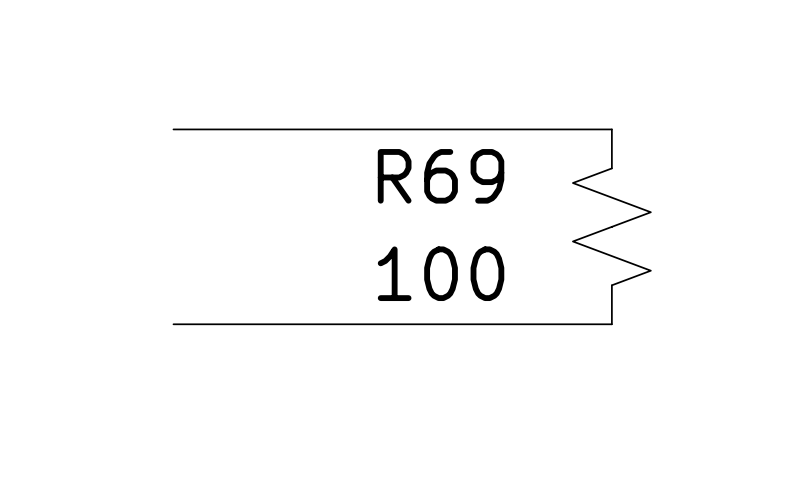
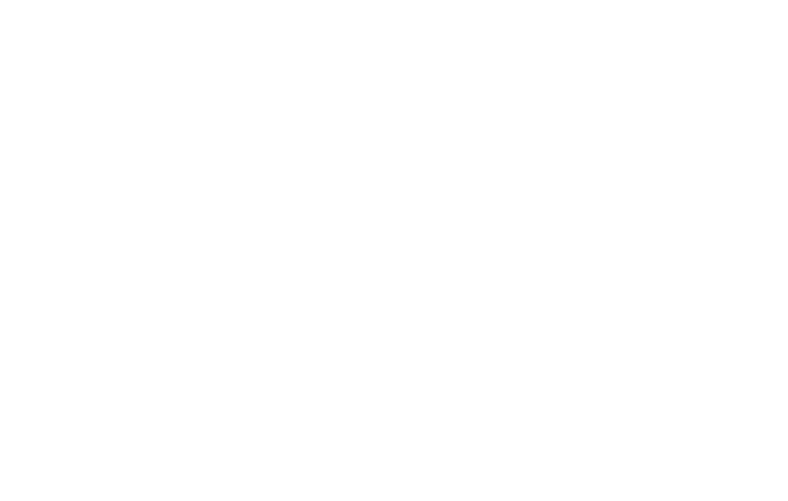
wire: (173, 129) (611, 129) -> none
R69: 100 (611, 226) -> none
wire: (173, 324) (611, 324) -> none

